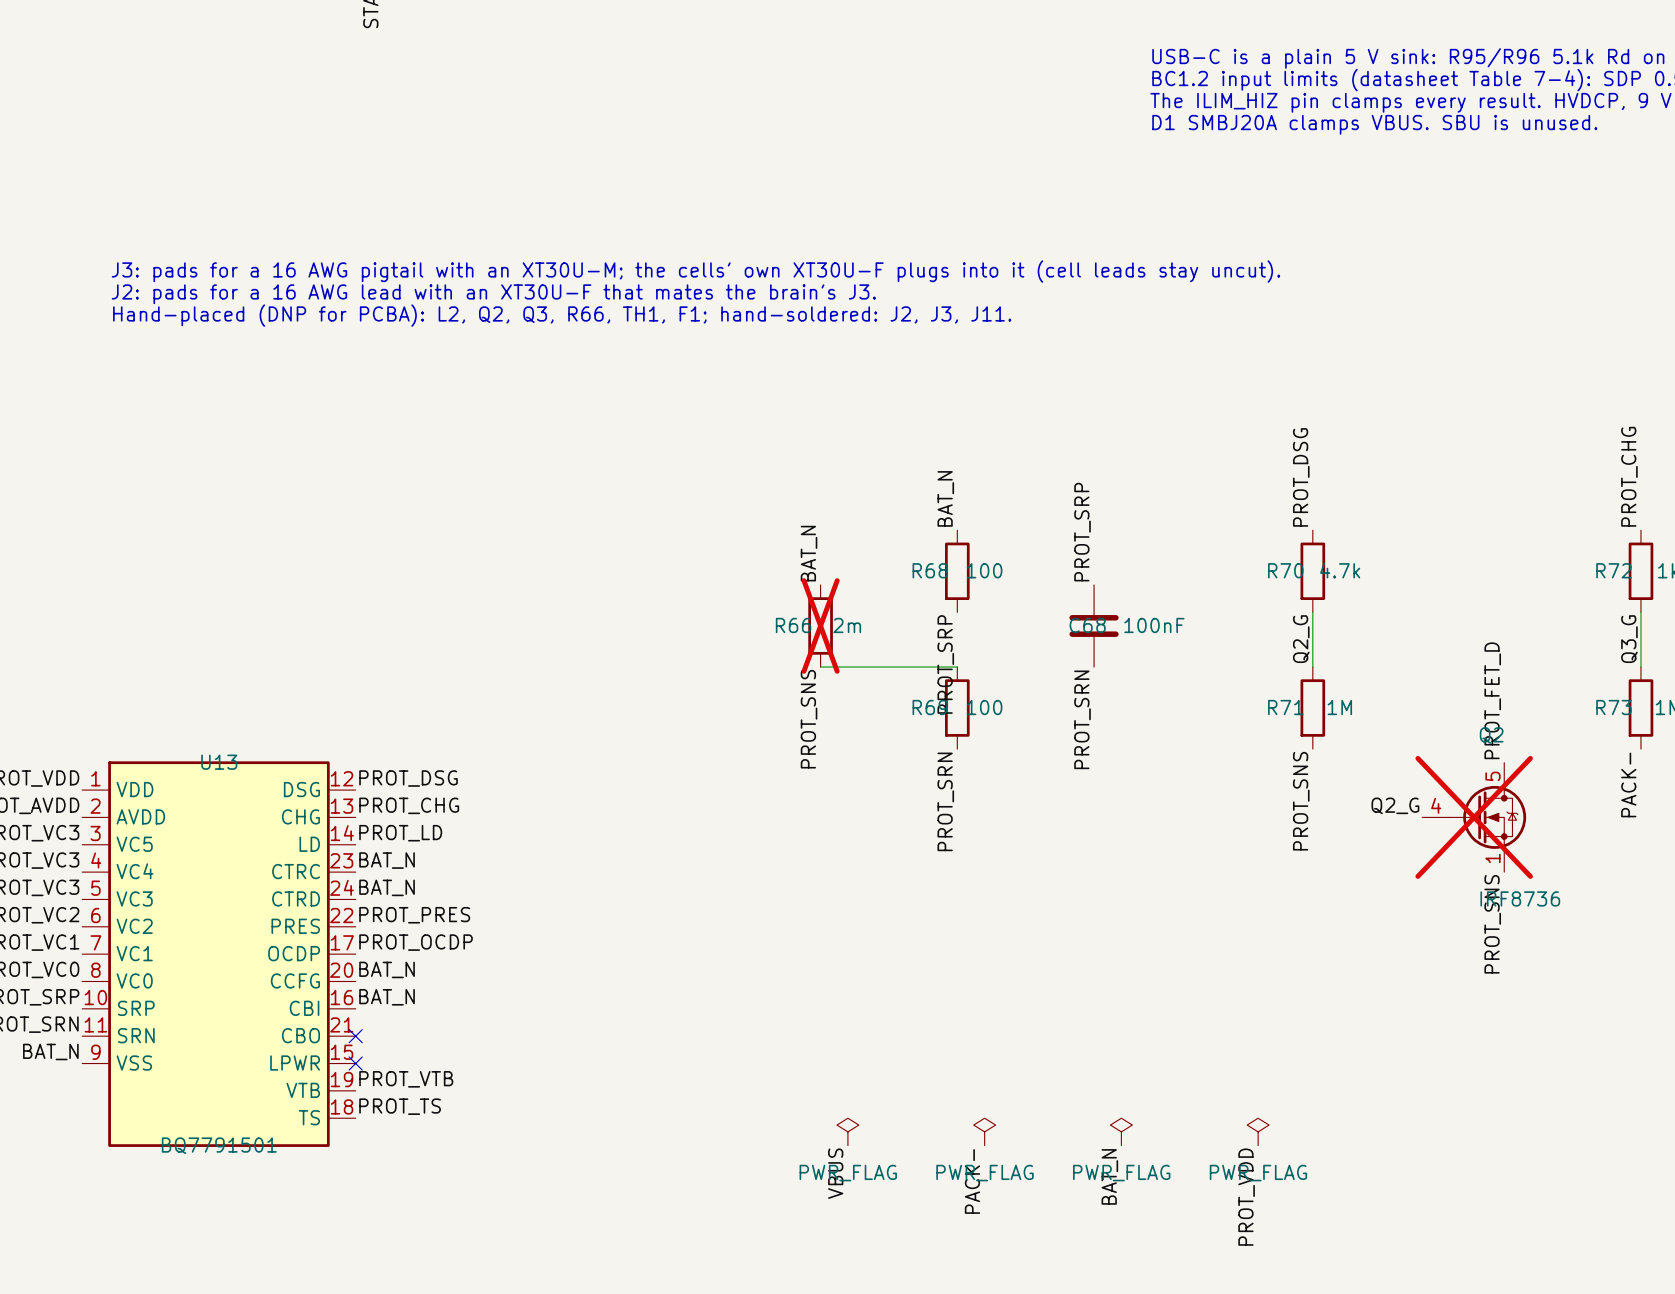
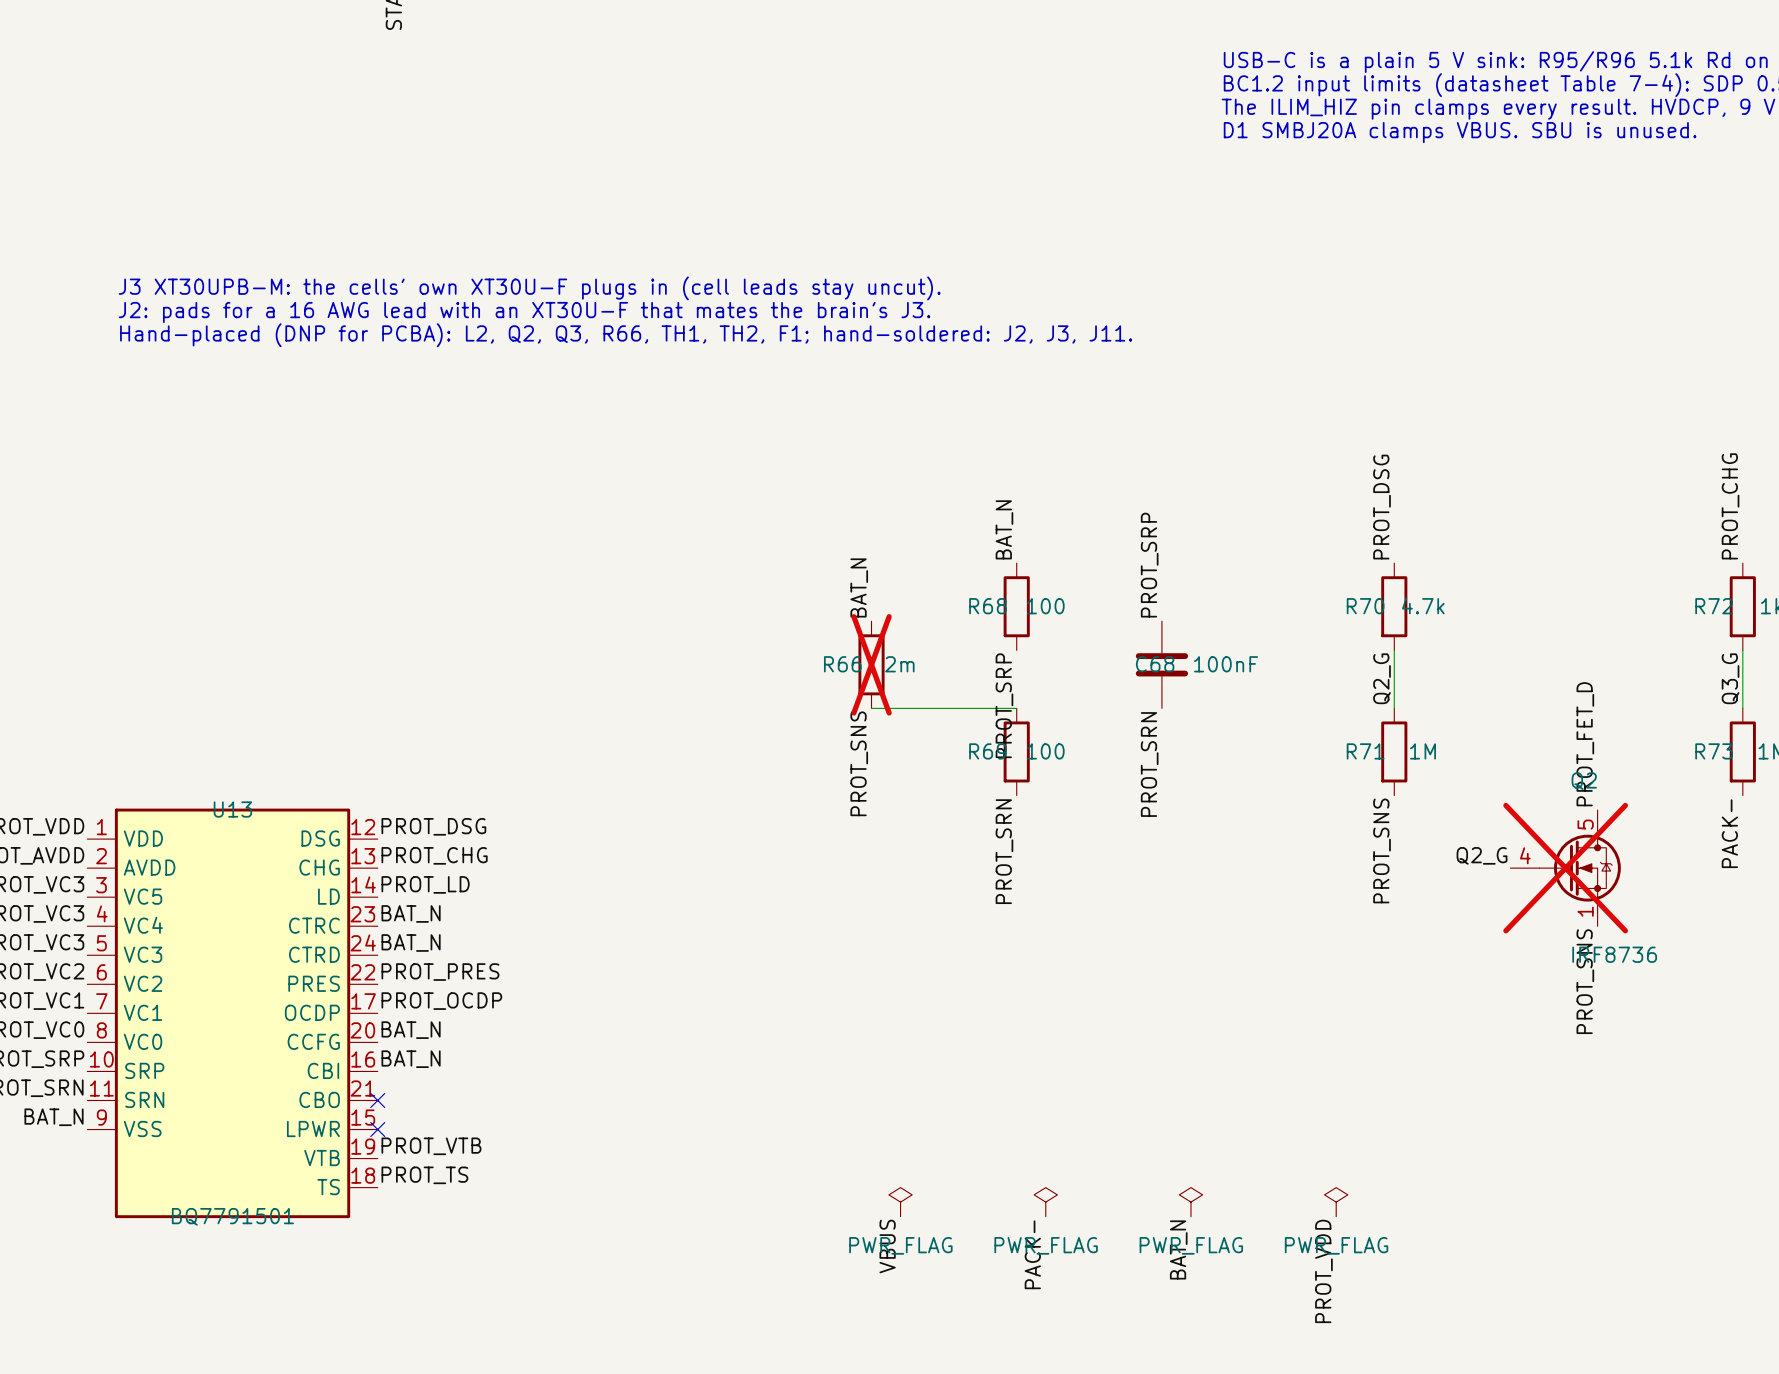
text: J3: pads for a 16 AWG pigtail with an XT30U-M; the cells' own XT30U-F plugs into it (cell leads stay uncut). (695, 271) -> J3 XT30UPB-M: the cells' own XT30U-F plugs in (cell leads stay uncut). (529, 288)
text: Hand-placed (DNP for PCBA): L2, Q2, Q3, R66, TH1, F1; hand-soldered: J2, J3, J11. (562, 315) -> Hand-placed (DNP for PCBA): L2, Q2, Q3, R66, TH1, TH2, F1; hand-soldered: J2, J3, J11. (626, 335)

